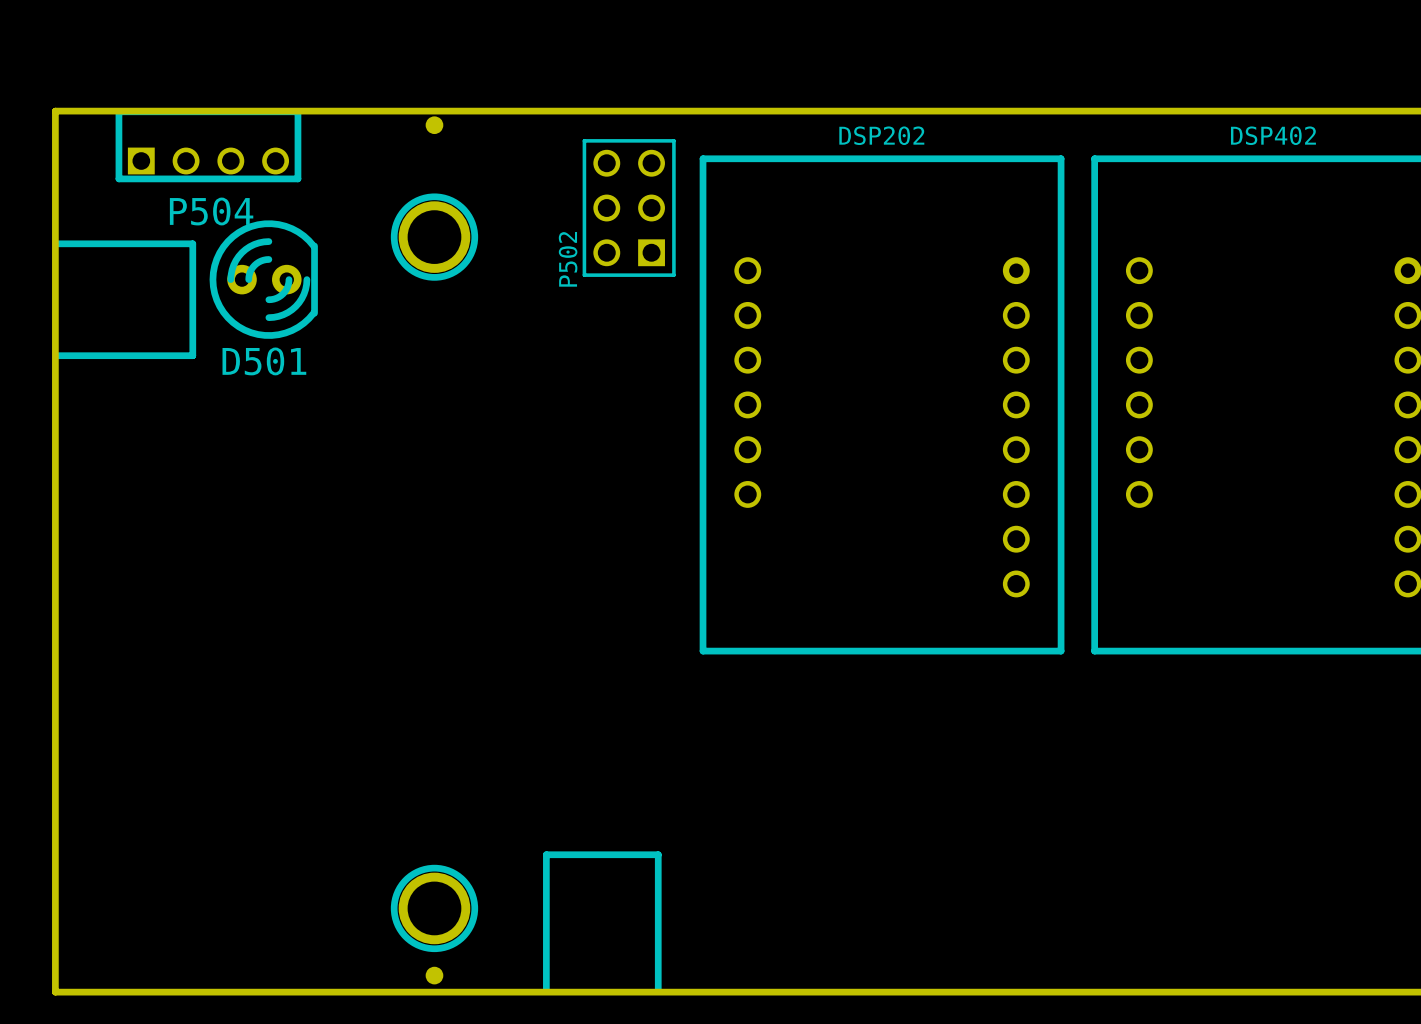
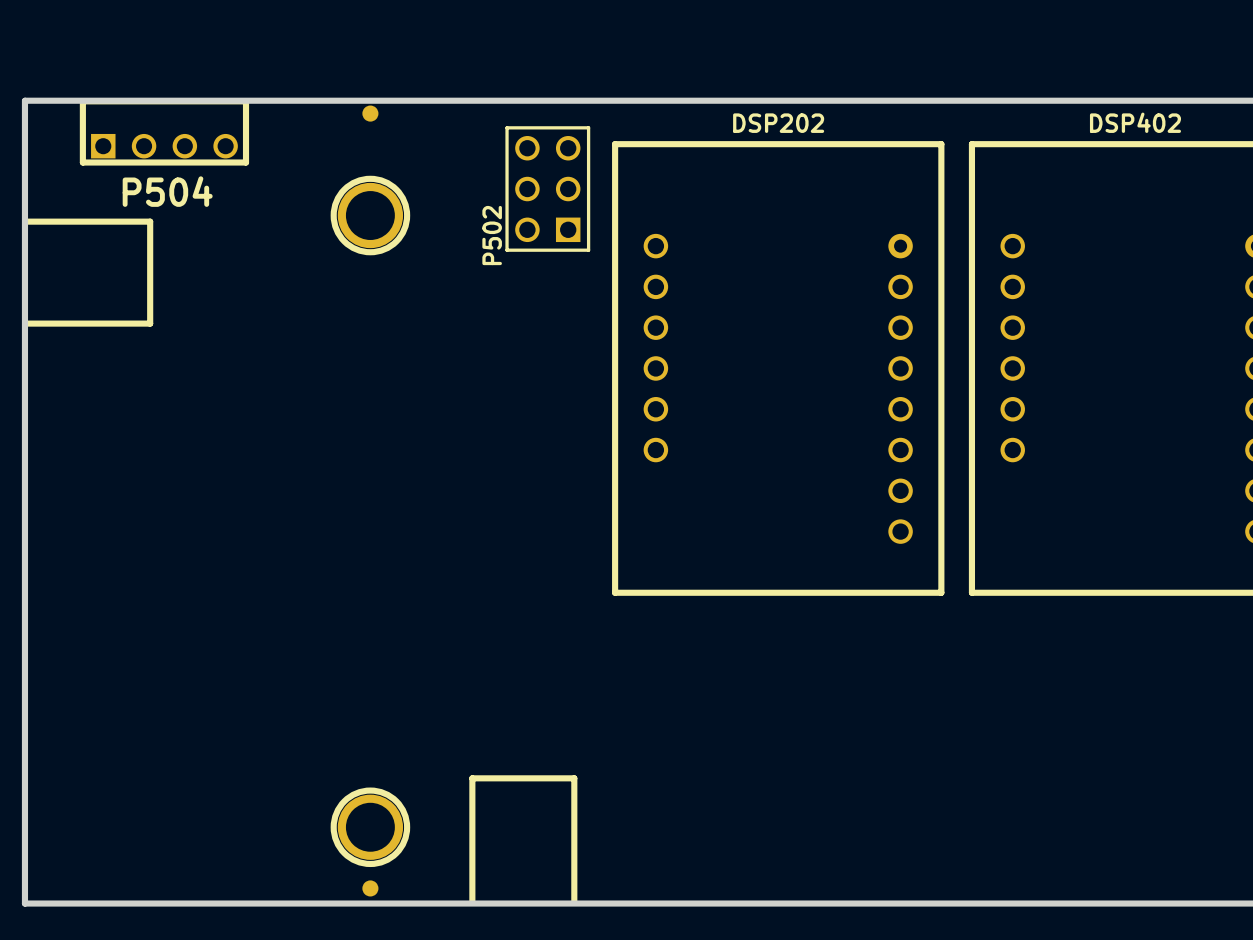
D501: (263, 279) -> none

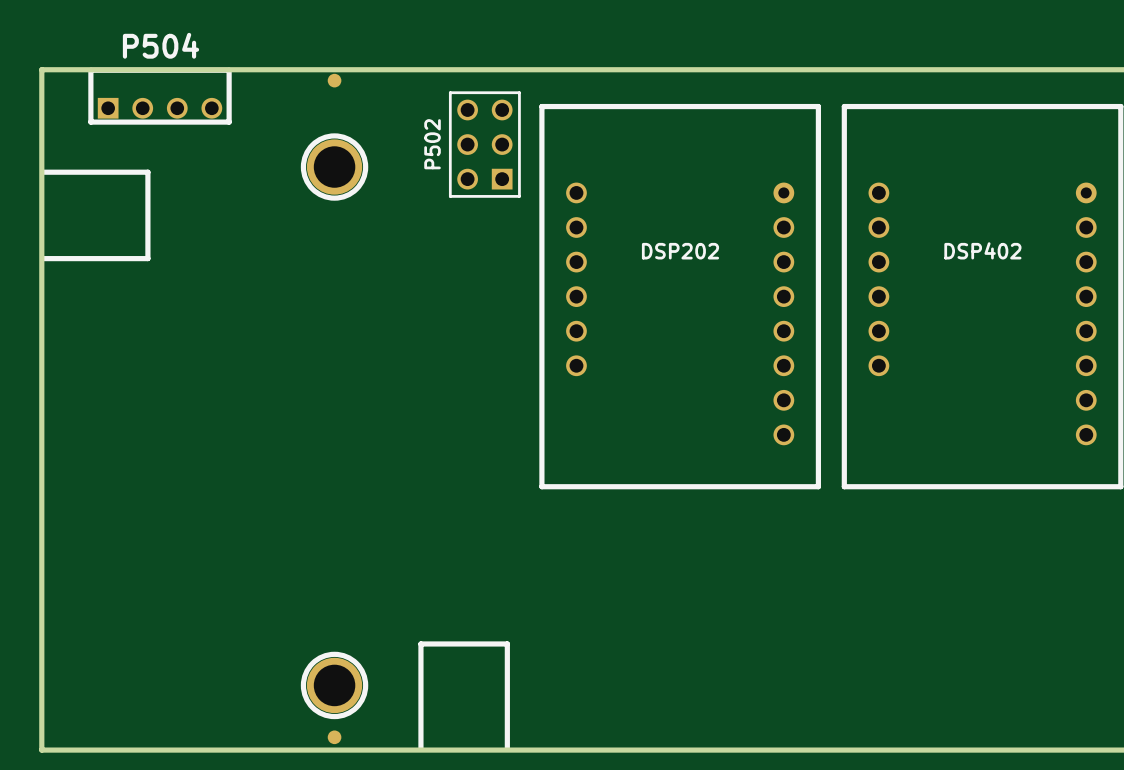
DSP402 name position: DSP402 (1135, 122) -> DSP402 (982, 250)
DSP202 name position: DSP202 (778, 123) -> DSP202 (680, 251)
P504 name position: P504 (167, 191) -> P504 (160, 45)
P502 name position: P502 (492, 235) -> P502 (432, 144)

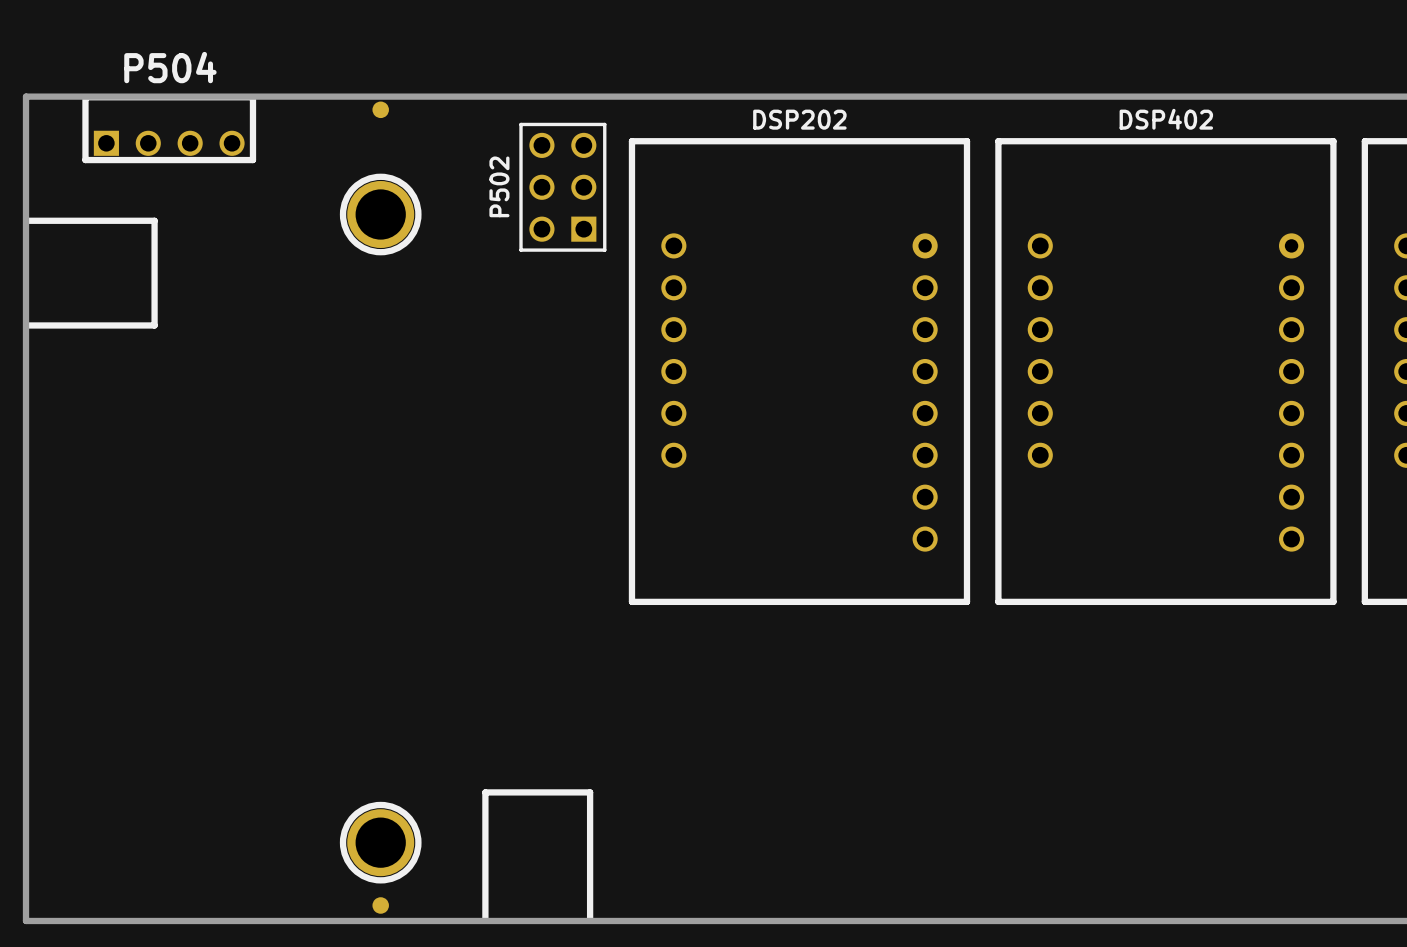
DSP402 name position: DSP402 (982, 250) -> DSP402 (1166, 119)
DSP202 name position: DSP202 (680, 251) -> DSP202 (799, 119)

